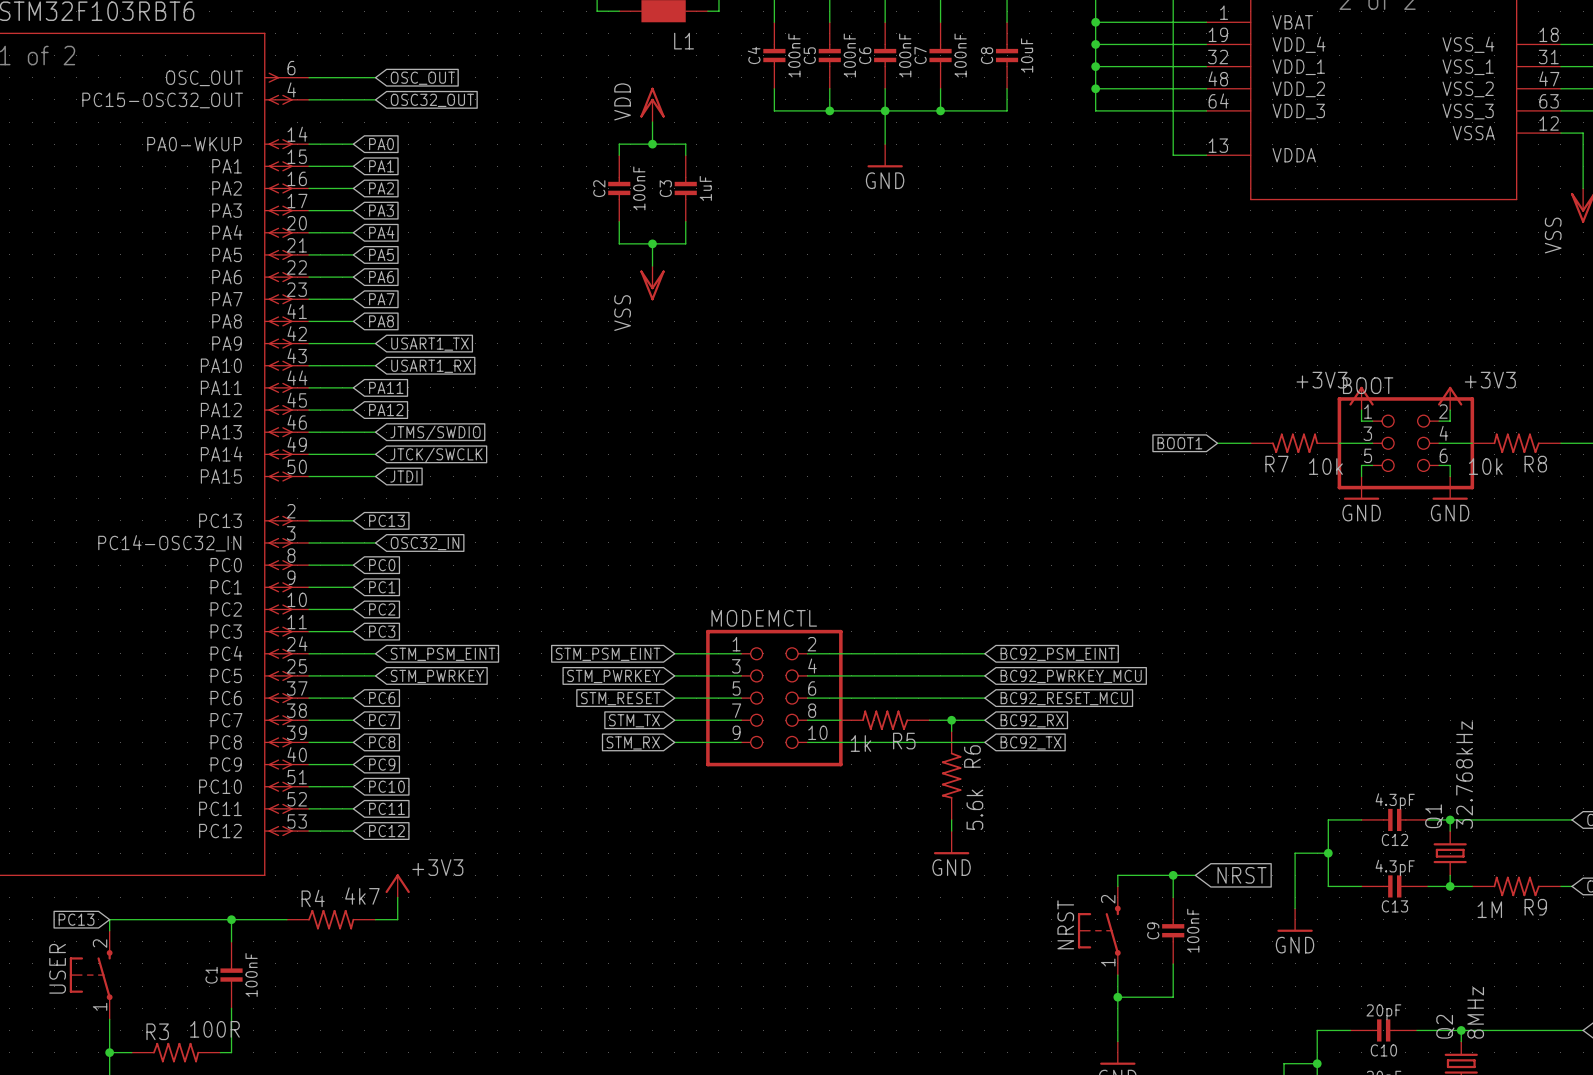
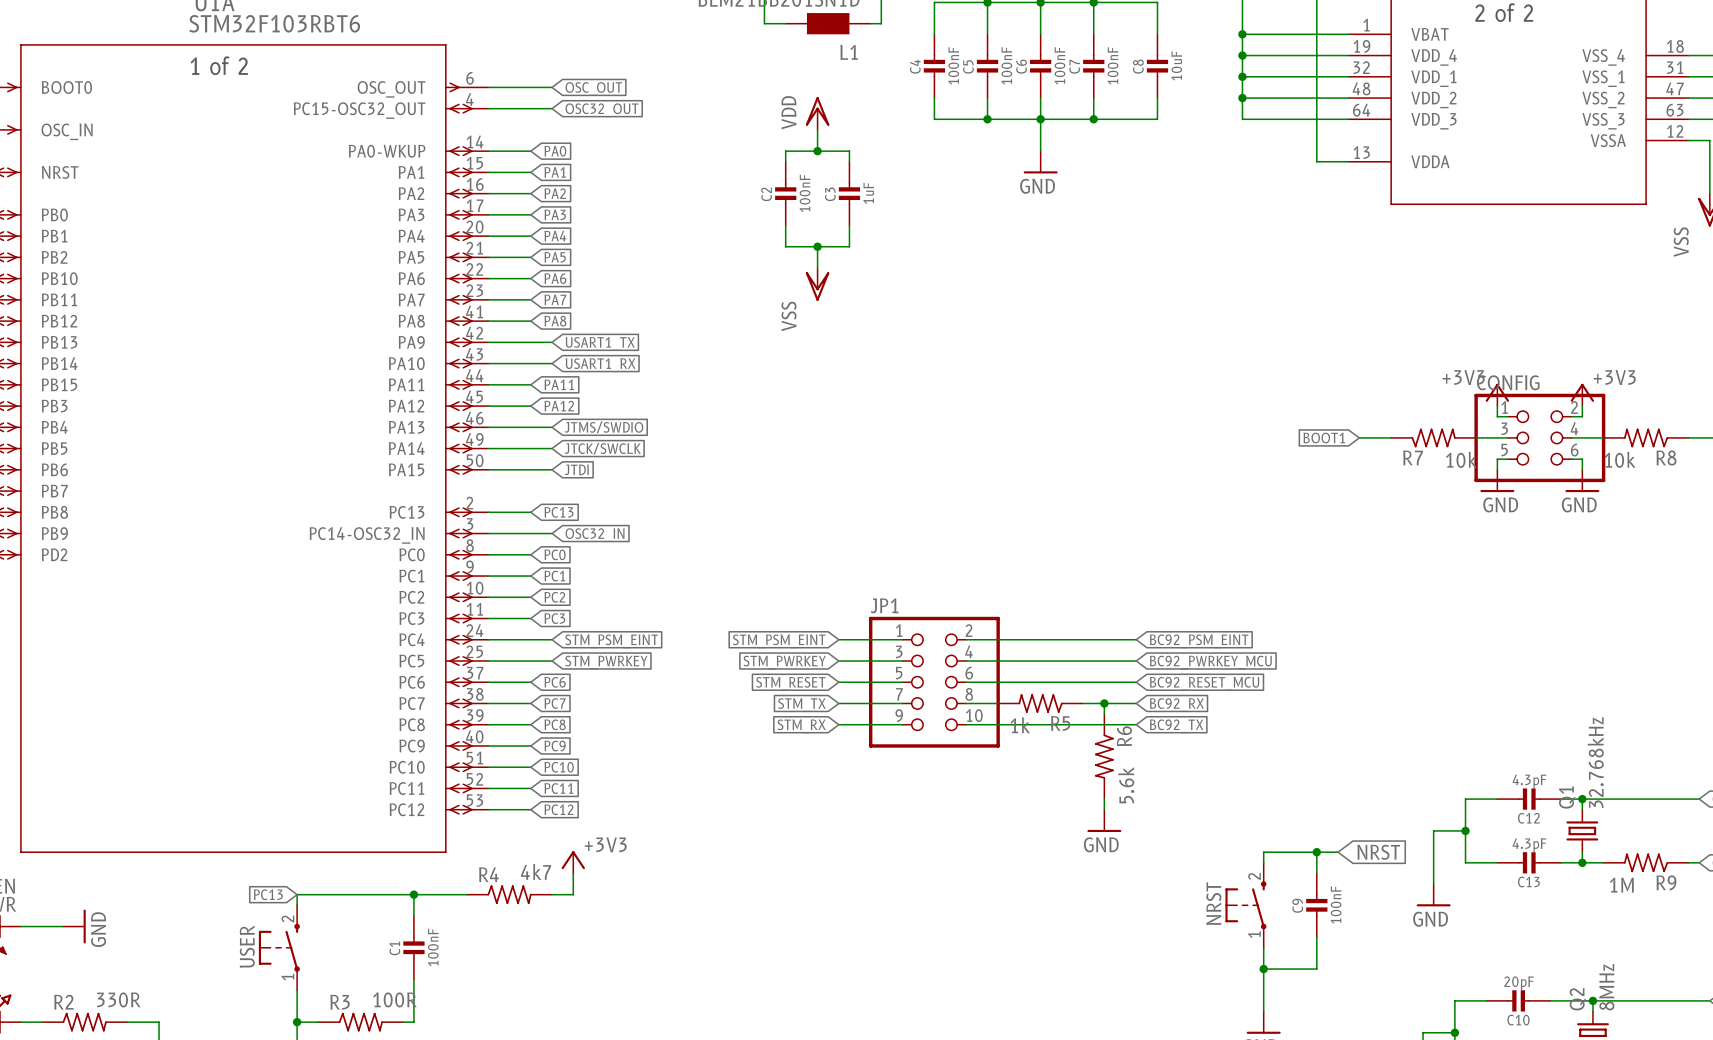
BOOT name: BOOT (1368, 385) -> CONFIG (1508, 382)
MODEMCTL name: MODEMCTL (764, 618) -> JP1 (884, 605)

